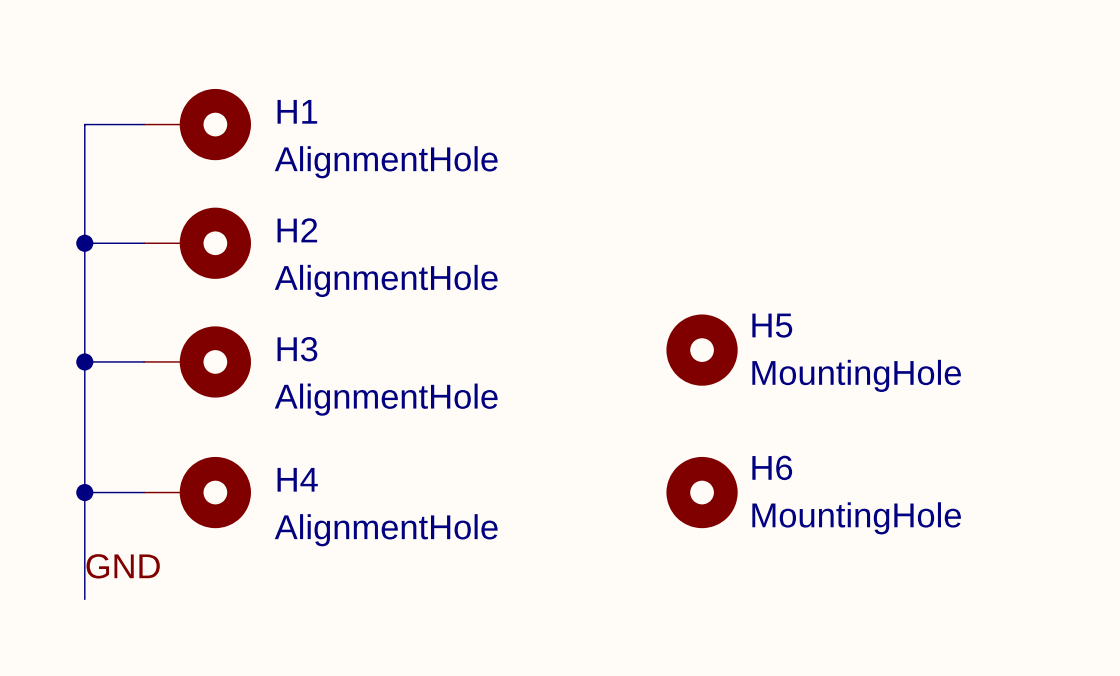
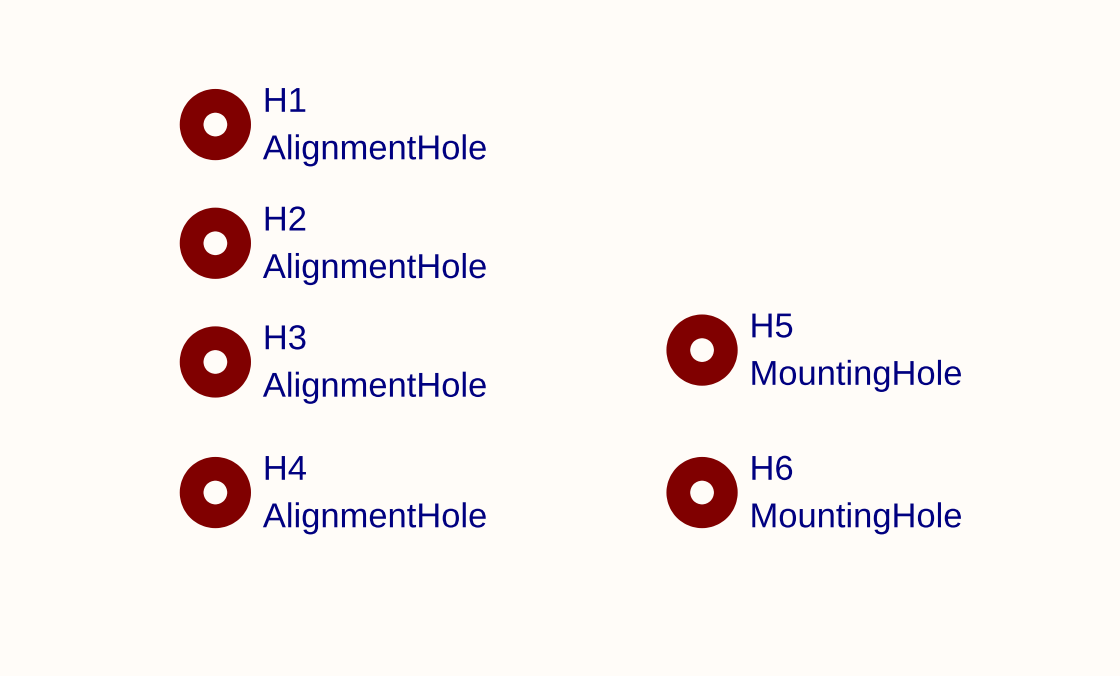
H1 symbol: [144, 88, 251, 161] -> [179, 88, 251, 161]
wire: (144, 124) (84, 124) (84, 599) -> none
H2 symbol: [144, 207, 251, 279] -> [179, 207, 251, 279]
wire: (84, 243) (144, 243) -> none
junction: (84, 243) -> none
H3 symbol: [144, 326, 251, 398] -> [179, 326, 251, 398]
wire: (84, 361) (144, 361) -> none
junction: (84, 361) -> none
H4 symbol: [144, 456, 251, 529] -> [179, 456, 251, 529]
wire: (84, 492) (144, 492) -> none
junction: (84, 492) -> none
label: GND (123, 566) -> none

